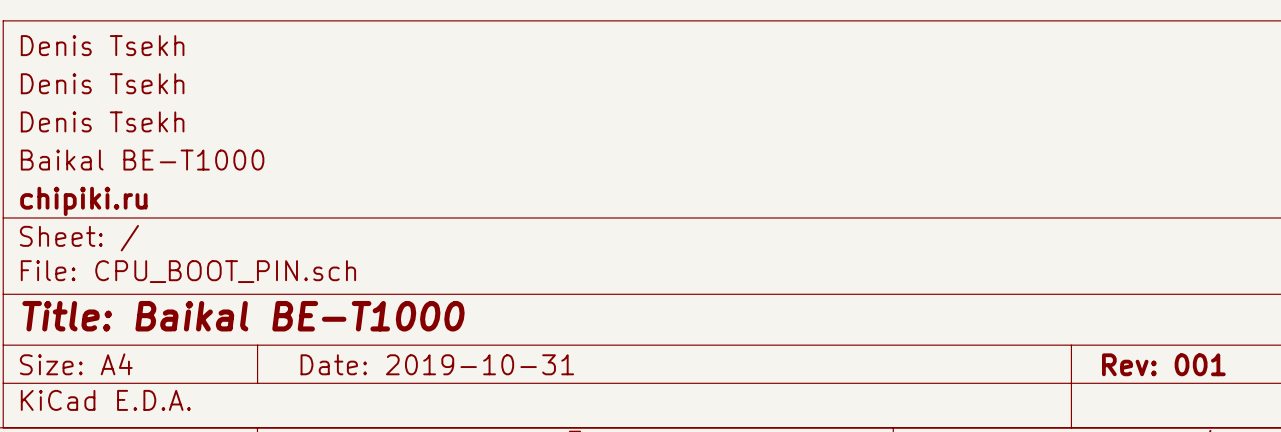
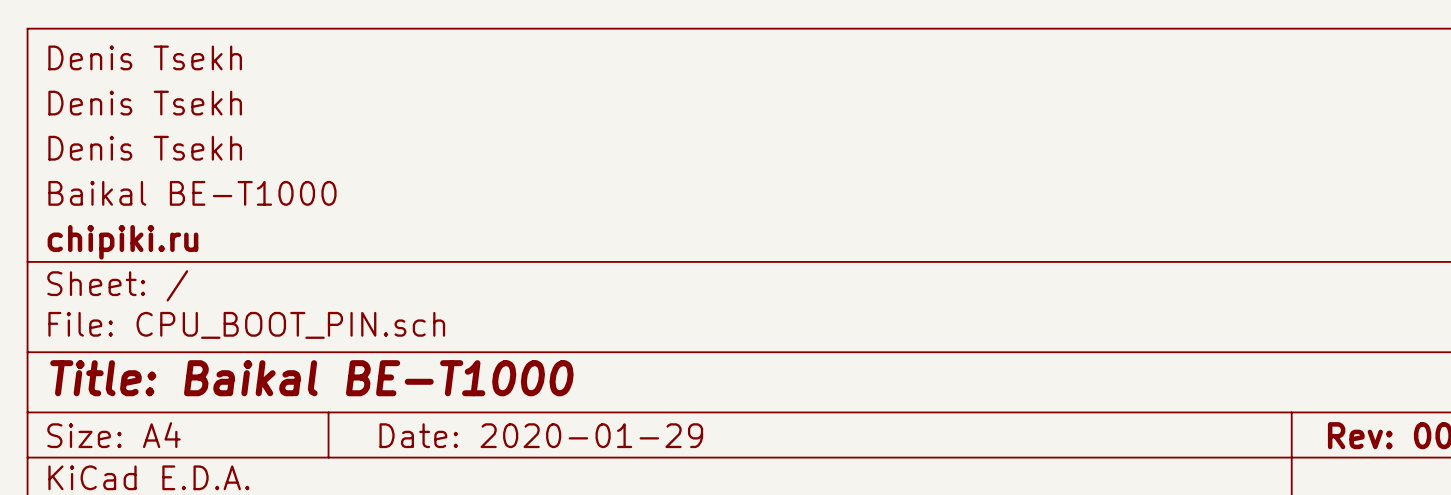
title block: Date: 2019-10-31 (437, 364) -> Date: 2020-01-29 (541, 435)

